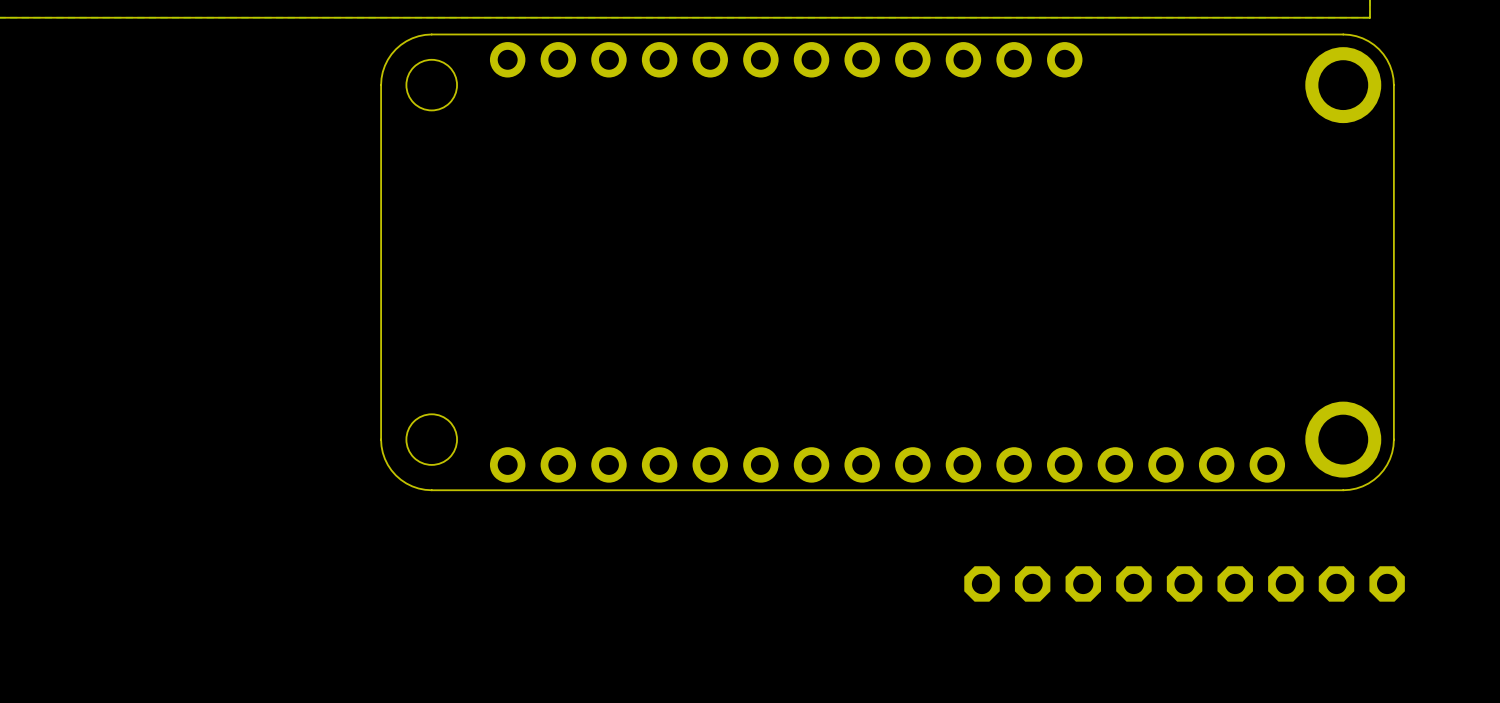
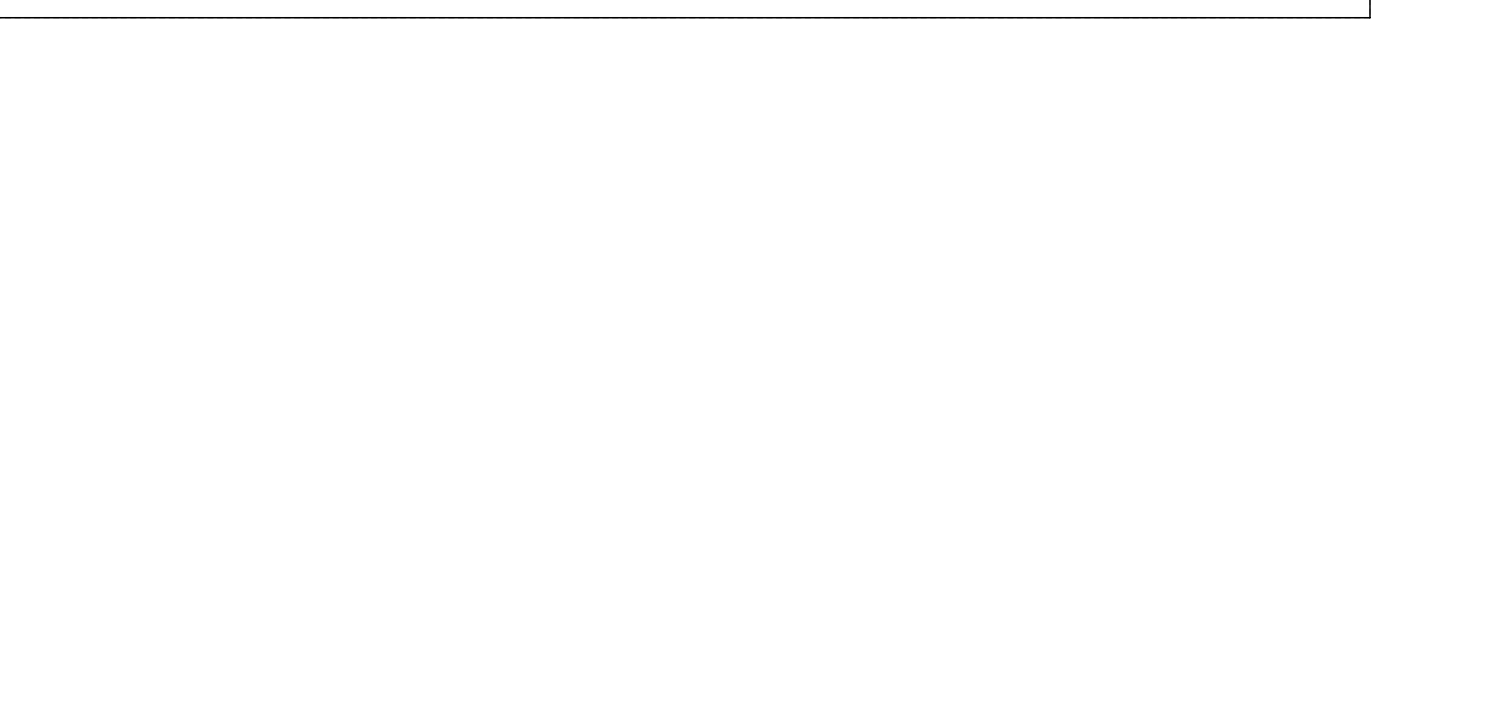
part: (887, 262) -> none
part: (1184, 583) -> none

